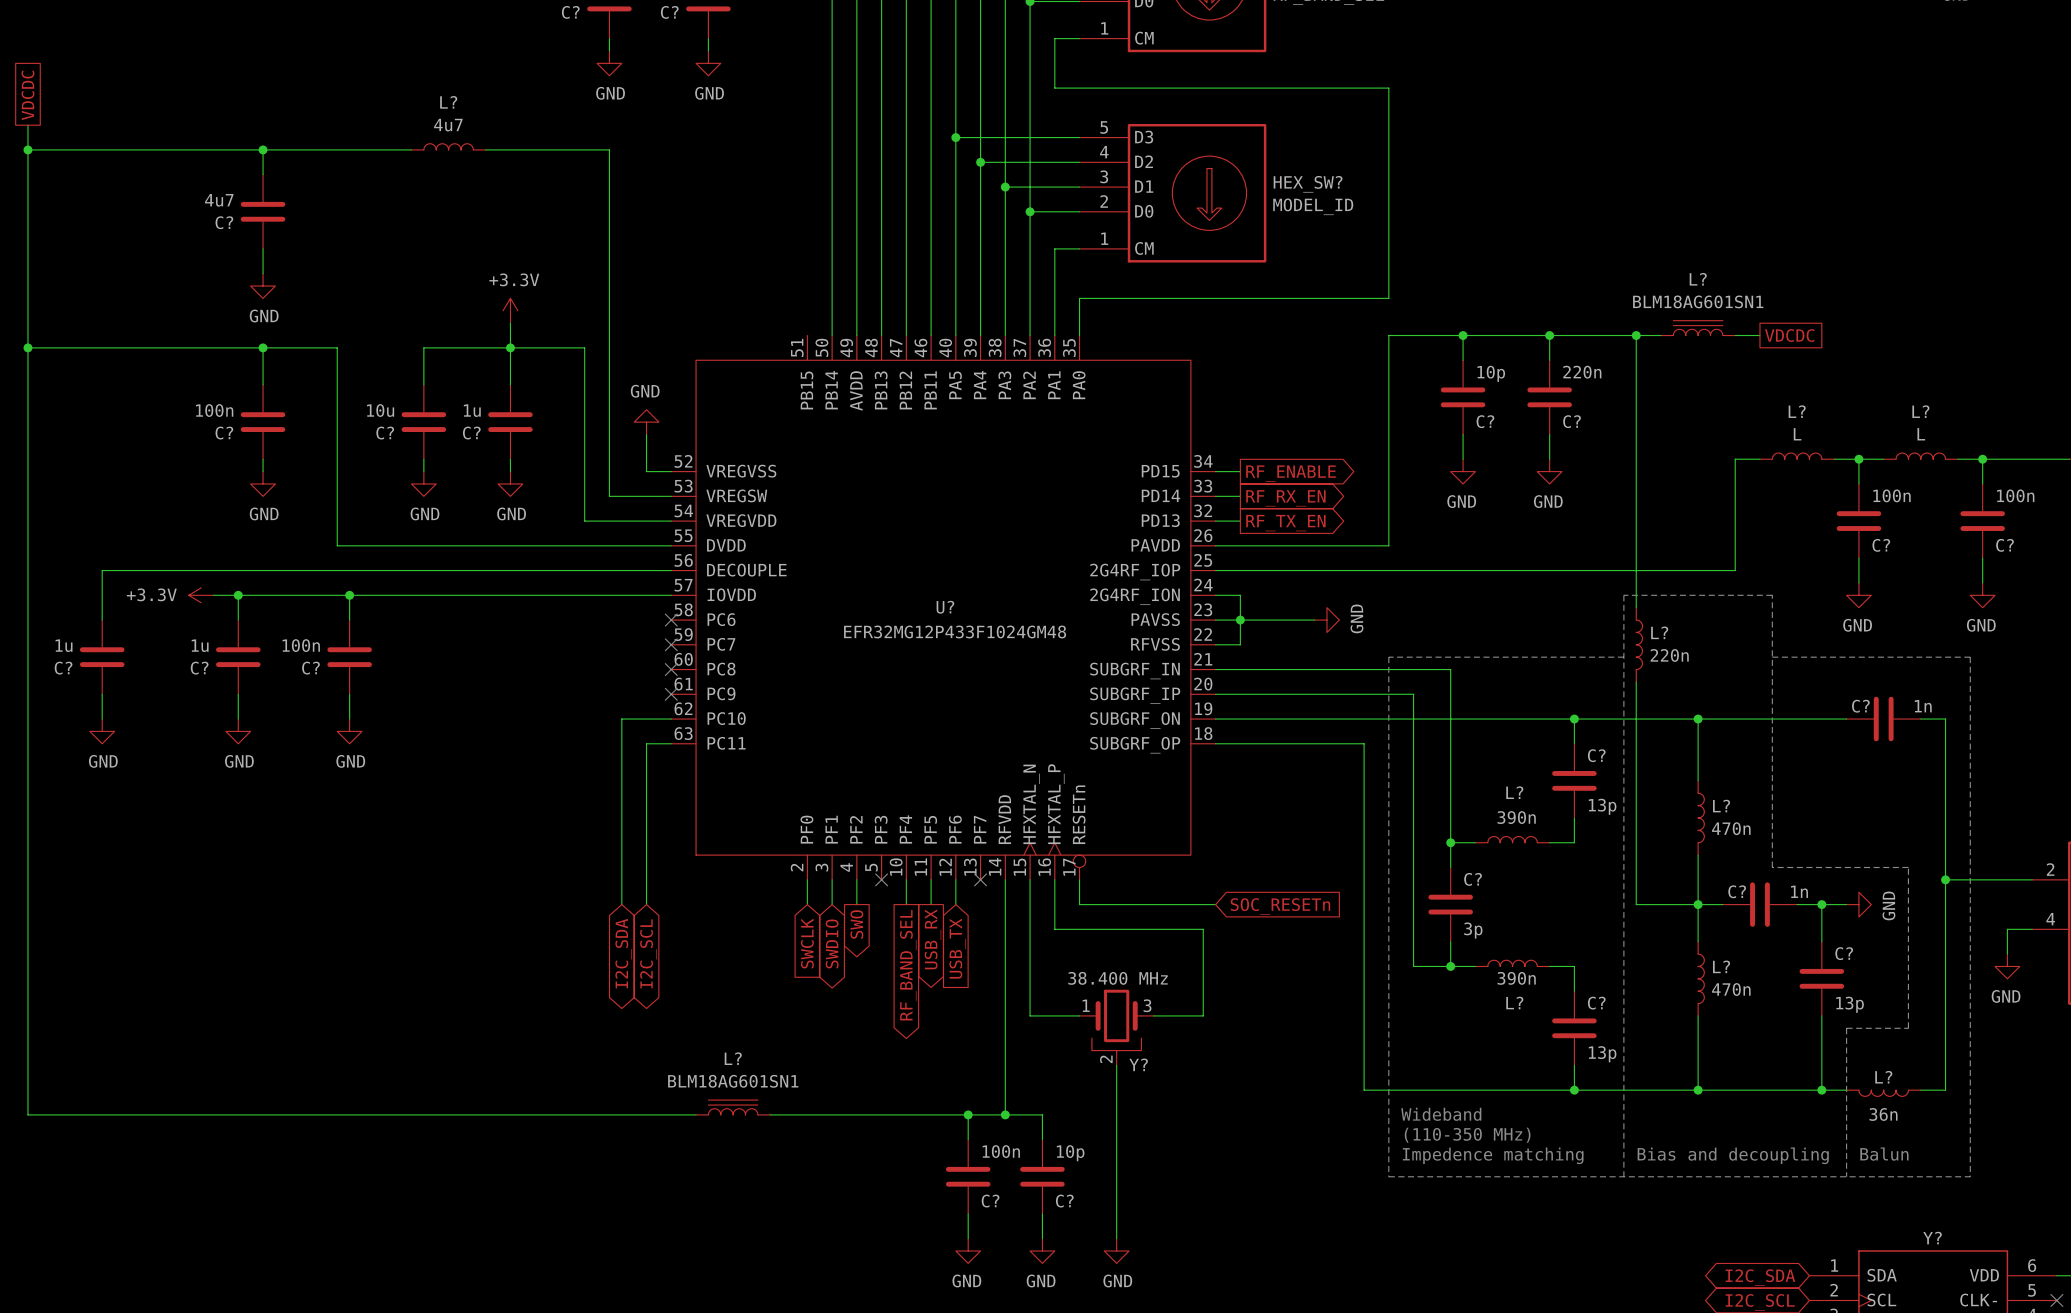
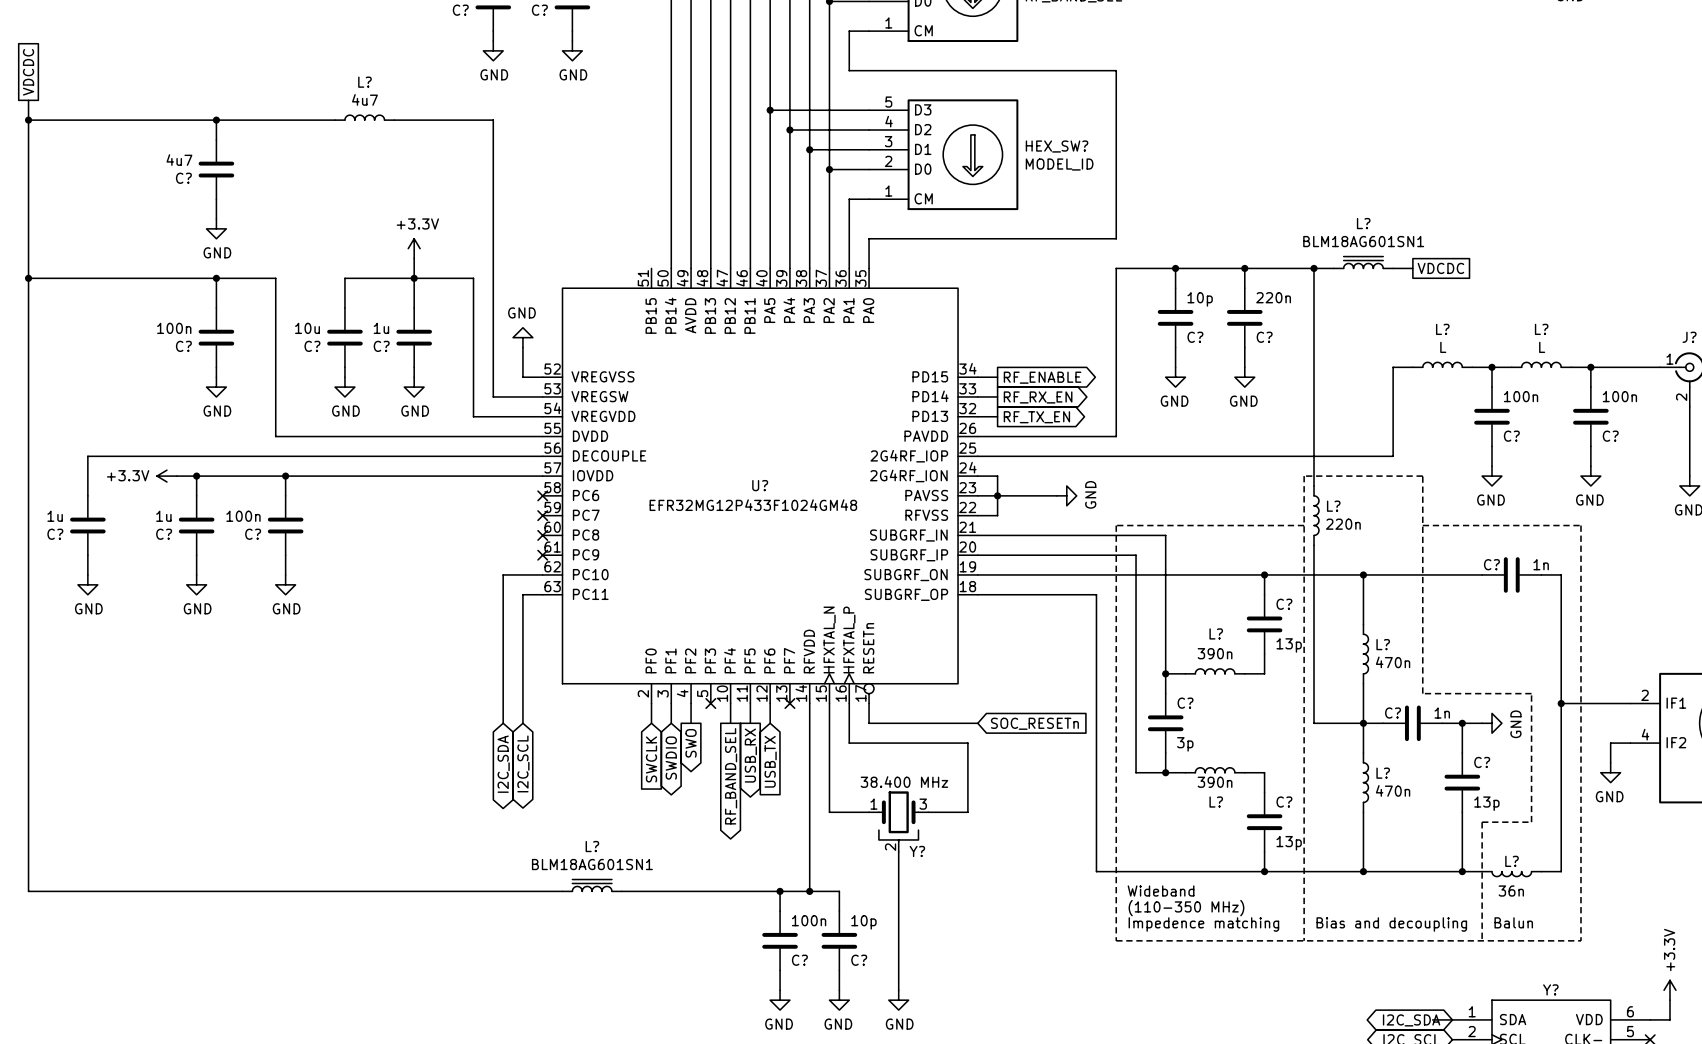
wire: none -> (1432, 1019) (1452, 1019)

